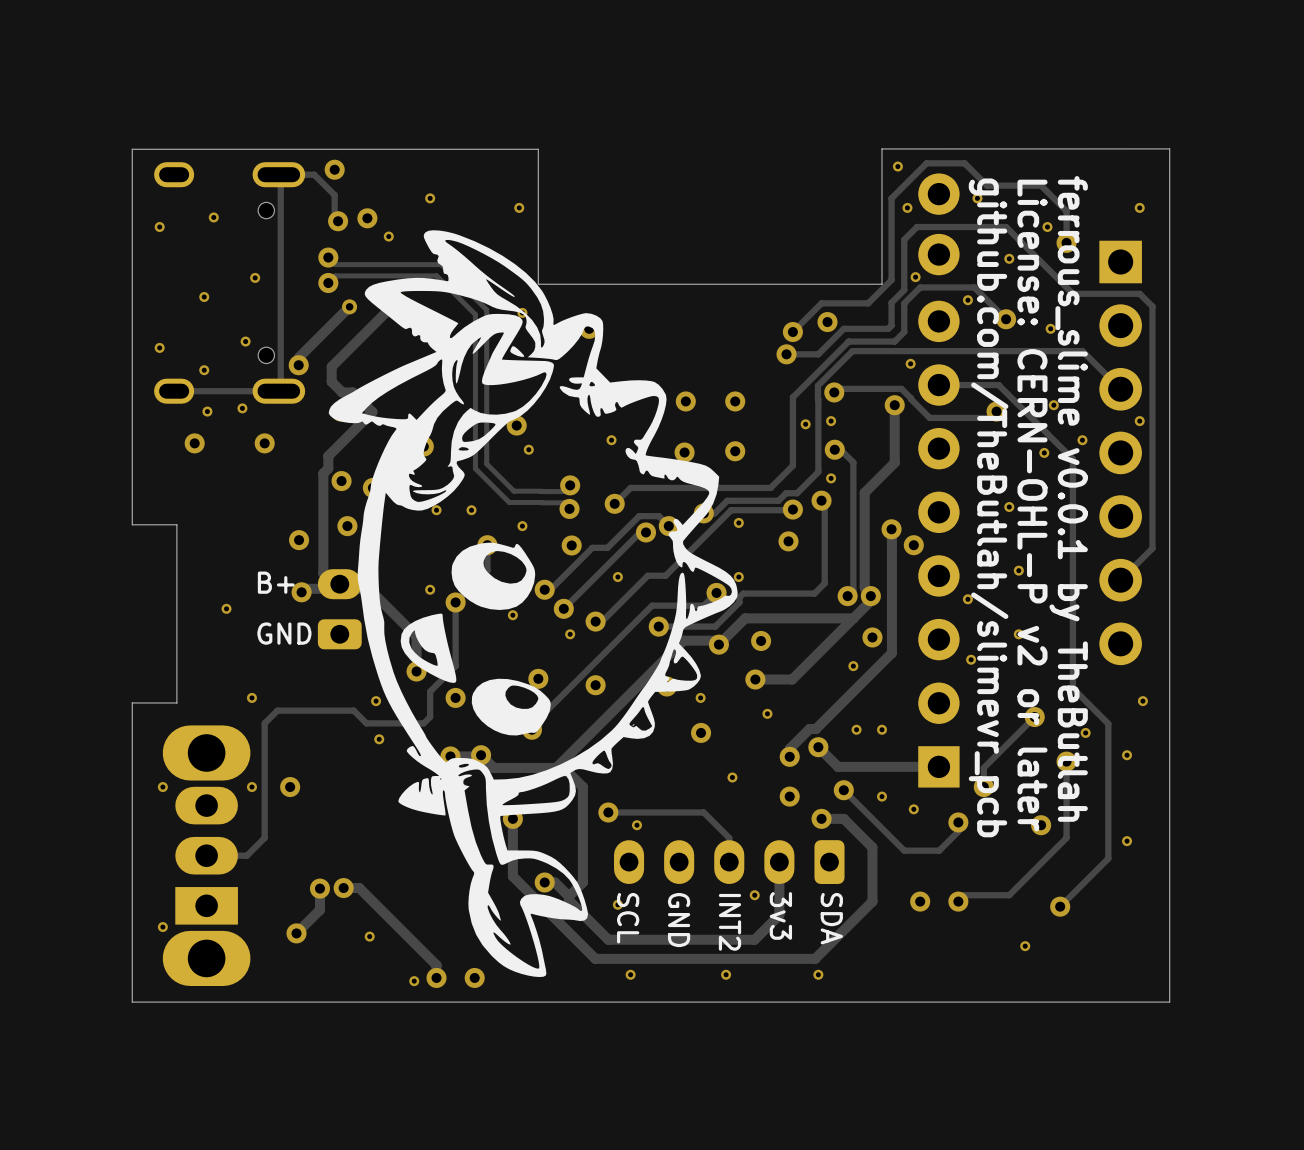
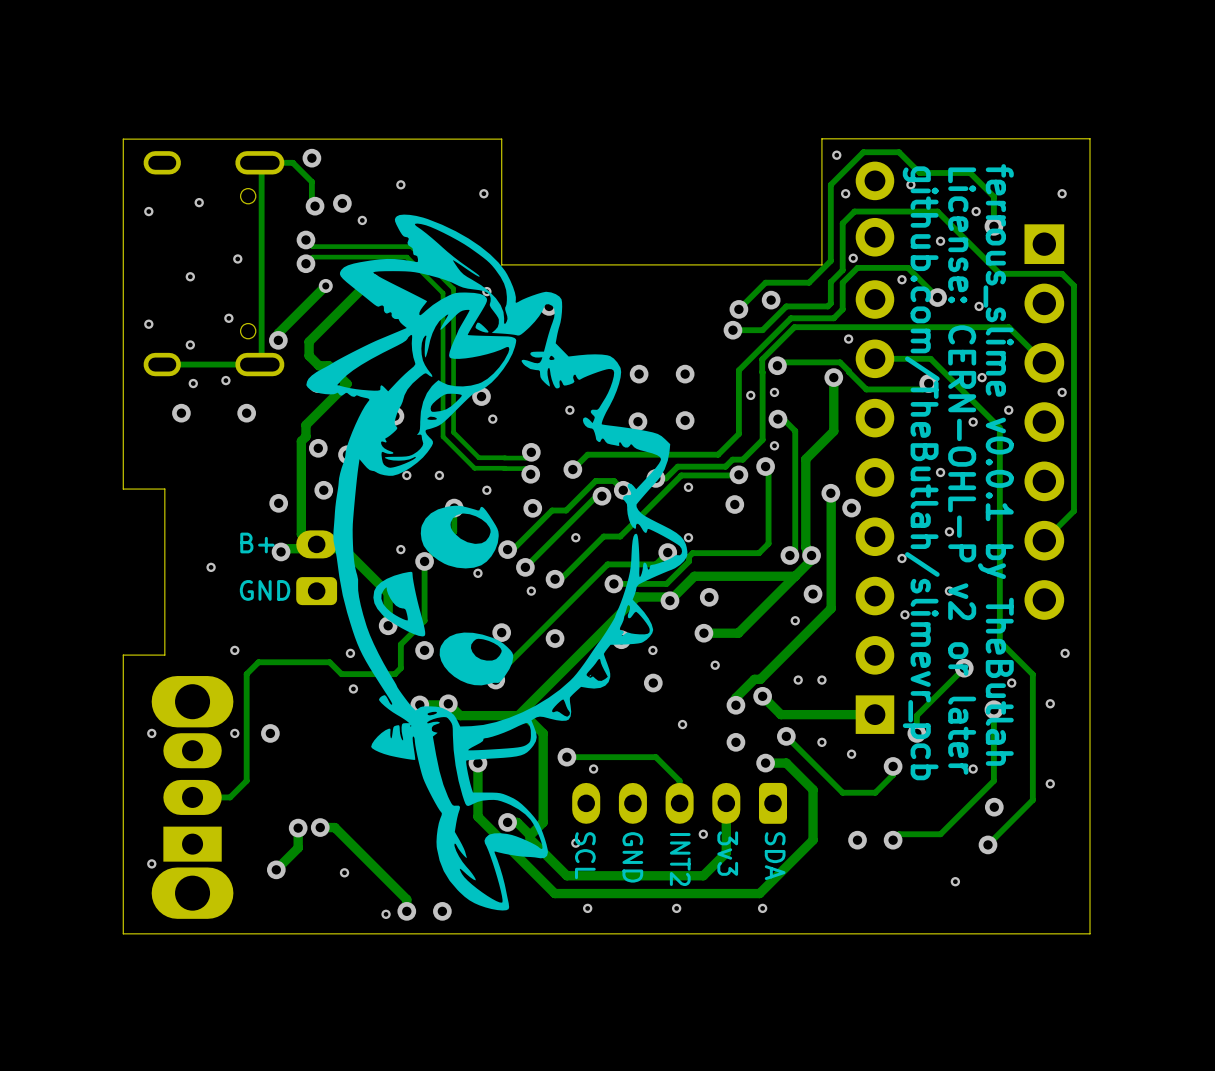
via position: (1041, 825) -> (994, 807)
via: none -> (973, 769)

